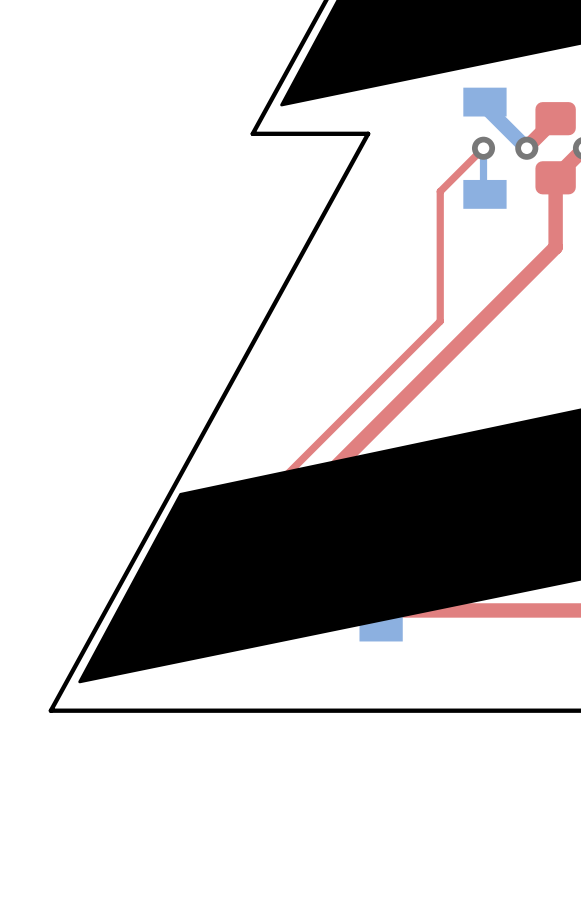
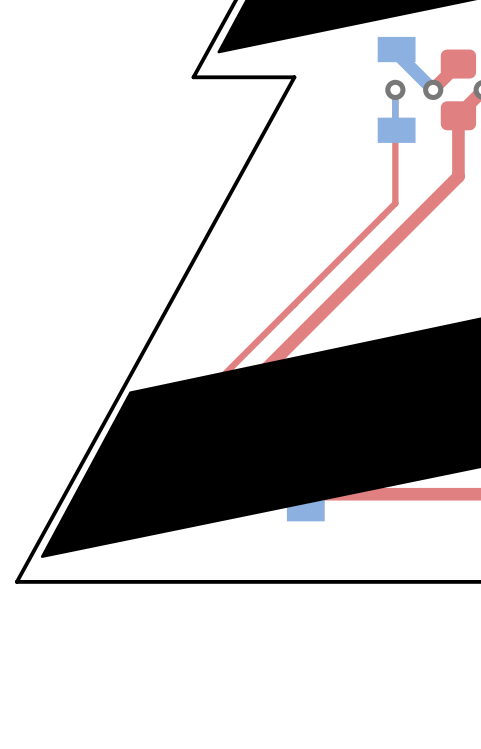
top track: (483, 148) (440, 191) (440, 321) -> (395, 89) (395, 203) (357, 241)

